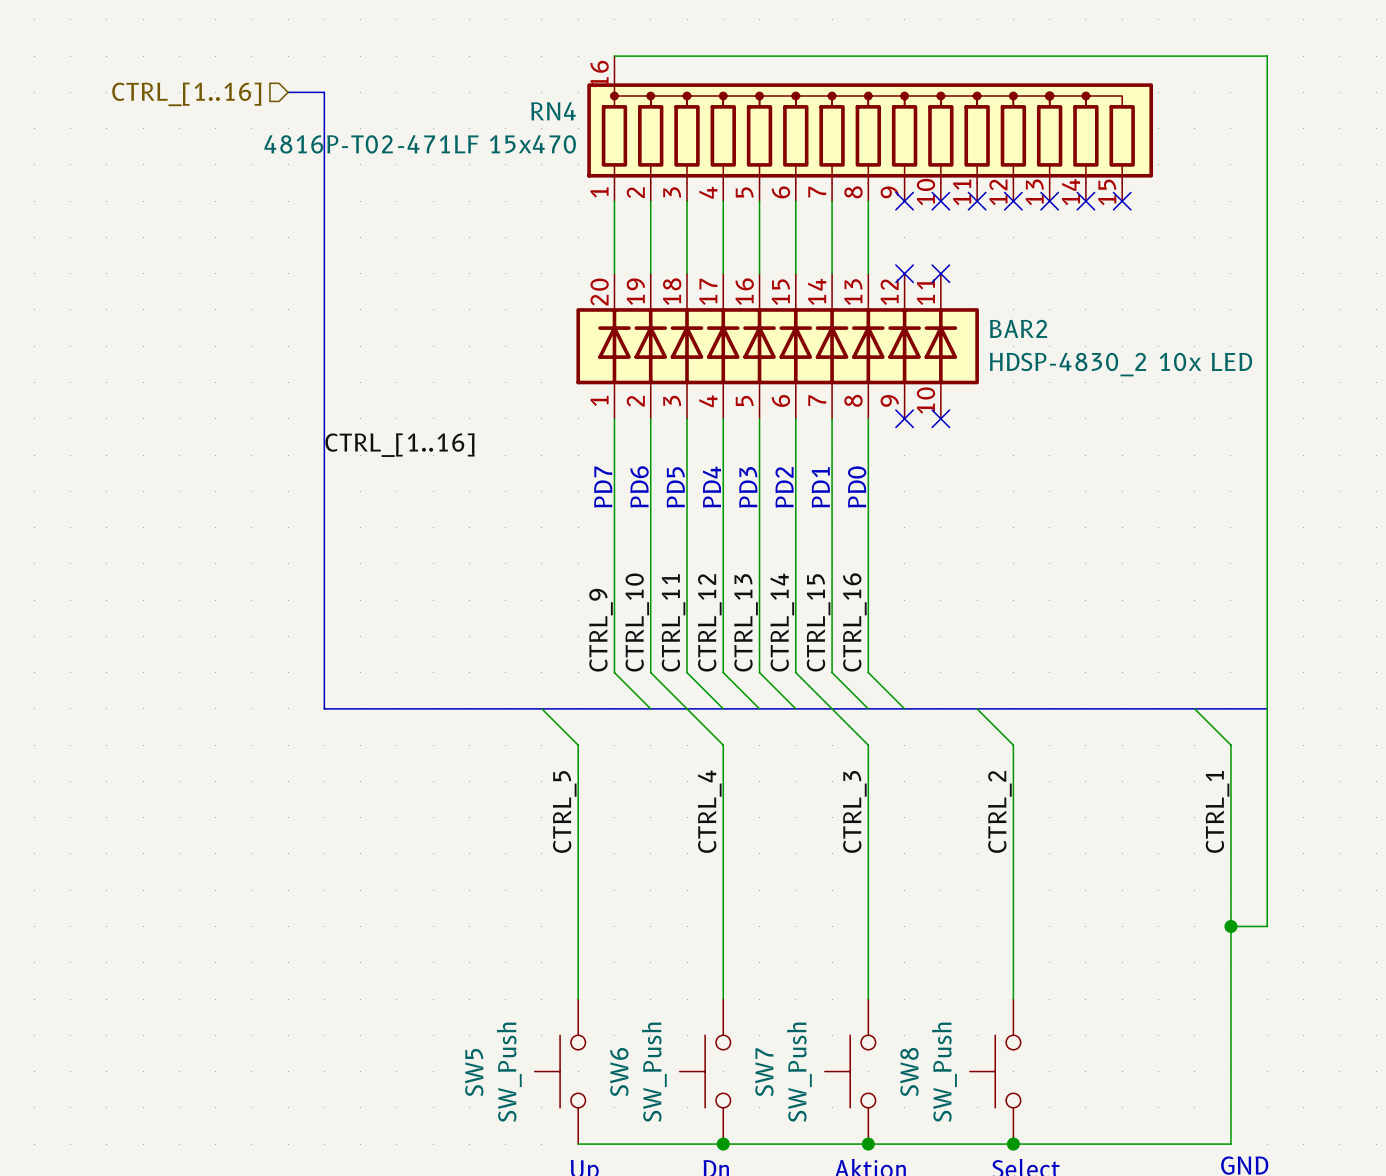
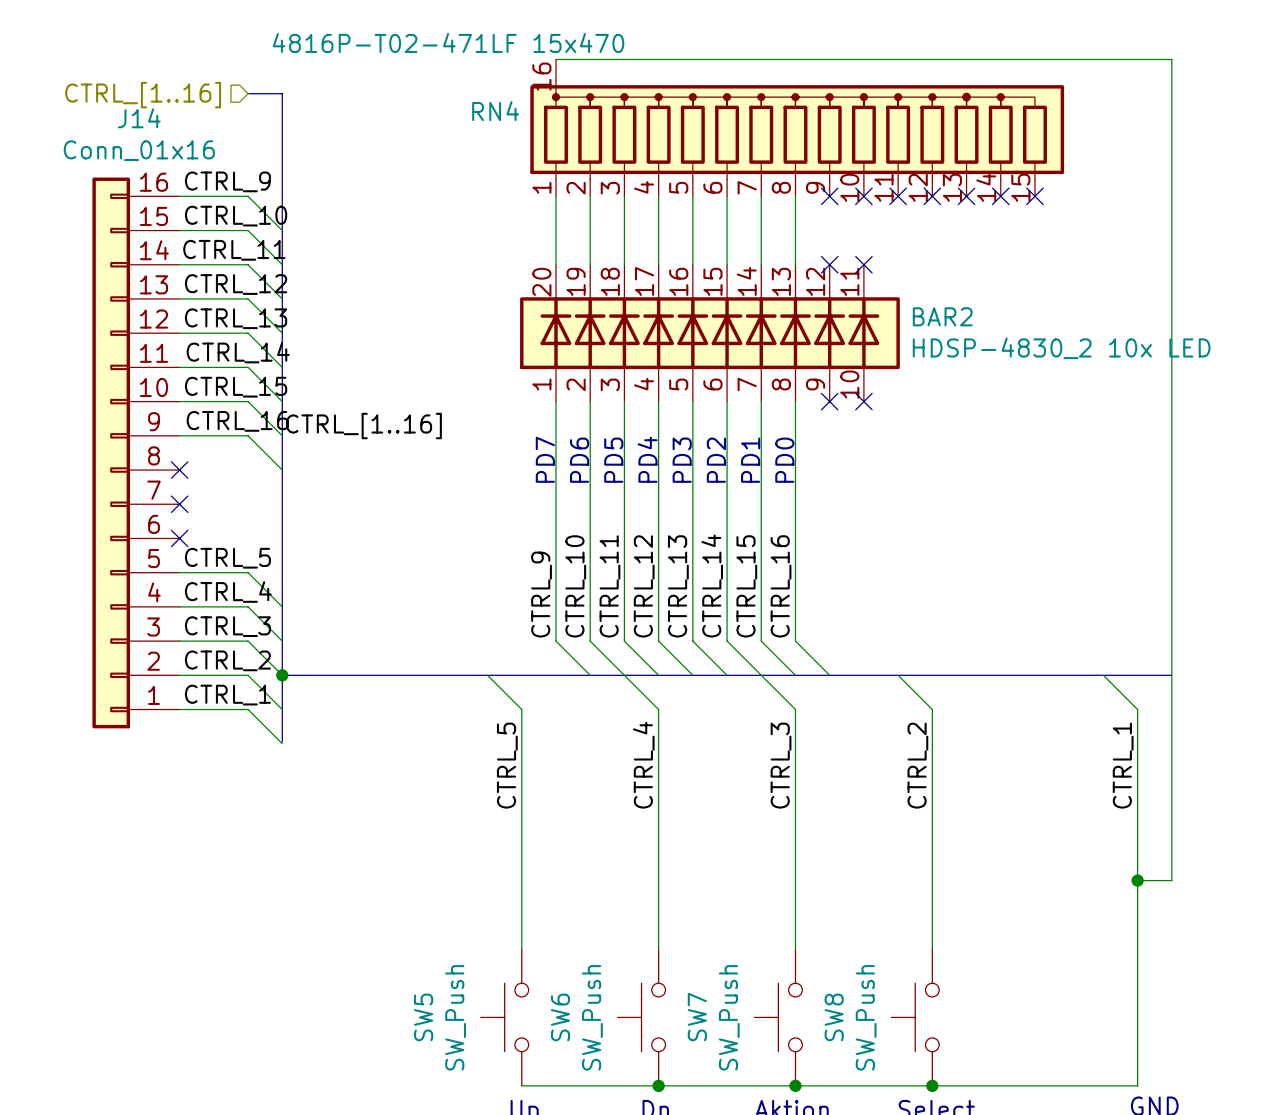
RN4 value position: 4816P-T02-471LF 15x470 (420, 144) -> 4816P-T02-471LF 15x470 (448, 43)
label: none -> CTRL_9 (227, 181)
wire: none -> (179, 196) (248, 196) (282, 230)
label: none -> CTRL_10 (236, 216)
wire: none -> (179, 230) (248, 230) (282, 264)
label: none -> CTRL_11 (234, 250)
wire: none -> (179, 264) (248, 264) (282, 298)
label: none -> CTRL_12 (236, 284)
wire: none -> (179, 298) (248, 298) (282, 333)
label: none -> CTRL_13 (236, 318)
wire: none -> (179, 333) (248, 333) (282, 367)
label: none -> CTRL_14 (238, 352)
wire: none -> (179, 367) (248, 367) (282, 401)
label: none -> CTRL_15 (236, 387)
wire: none -> (179, 401) (248, 401) (282, 435)
label: none -> CTRL_16 (237, 421)
wire: none -> (179, 435) (248, 435) (282, 470)
J14: none -> Conn_01x16 (136, 452)
no-connect mark: none -> (179, 470)
no-connect mark: none -> (179, 504)
no-connect mark: none -> (179, 538)
label: none -> CTRL_5 (227, 558)
wire: none -> (179, 572) (248, 572) (282, 606)
label: none -> CTRL_4 (228, 592)
wire: none -> (179, 606) (248, 606) (282, 641)
label: none -> CTRL_3 (227, 626)
wire: none -> (179, 641) (248, 641) (282, 675)
label: none -> CTRL_2 (227, 660)
wire: none -> (179, 675) (248, 675) (282, 709)
bus: none -> (282, 675) (282, 742)
junction: none -> (282, 675)
label: none -> CTRL_1 (227, 695)
wire: none -> (179, 709) (248, 709) (282, 743)

